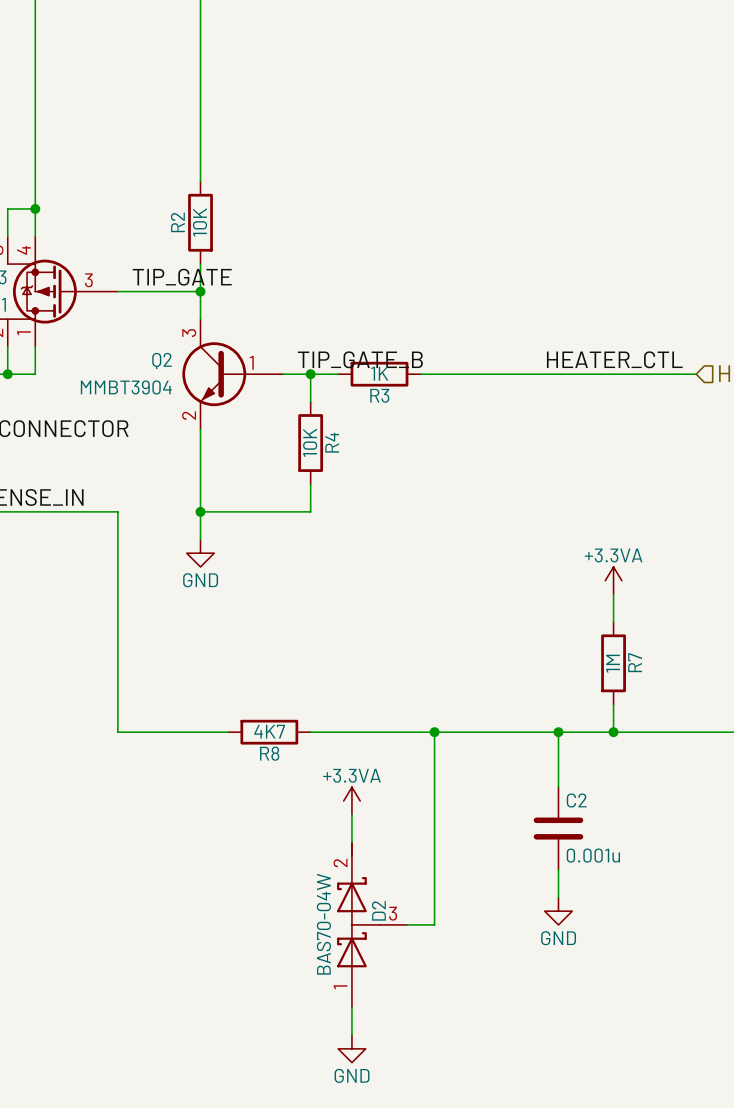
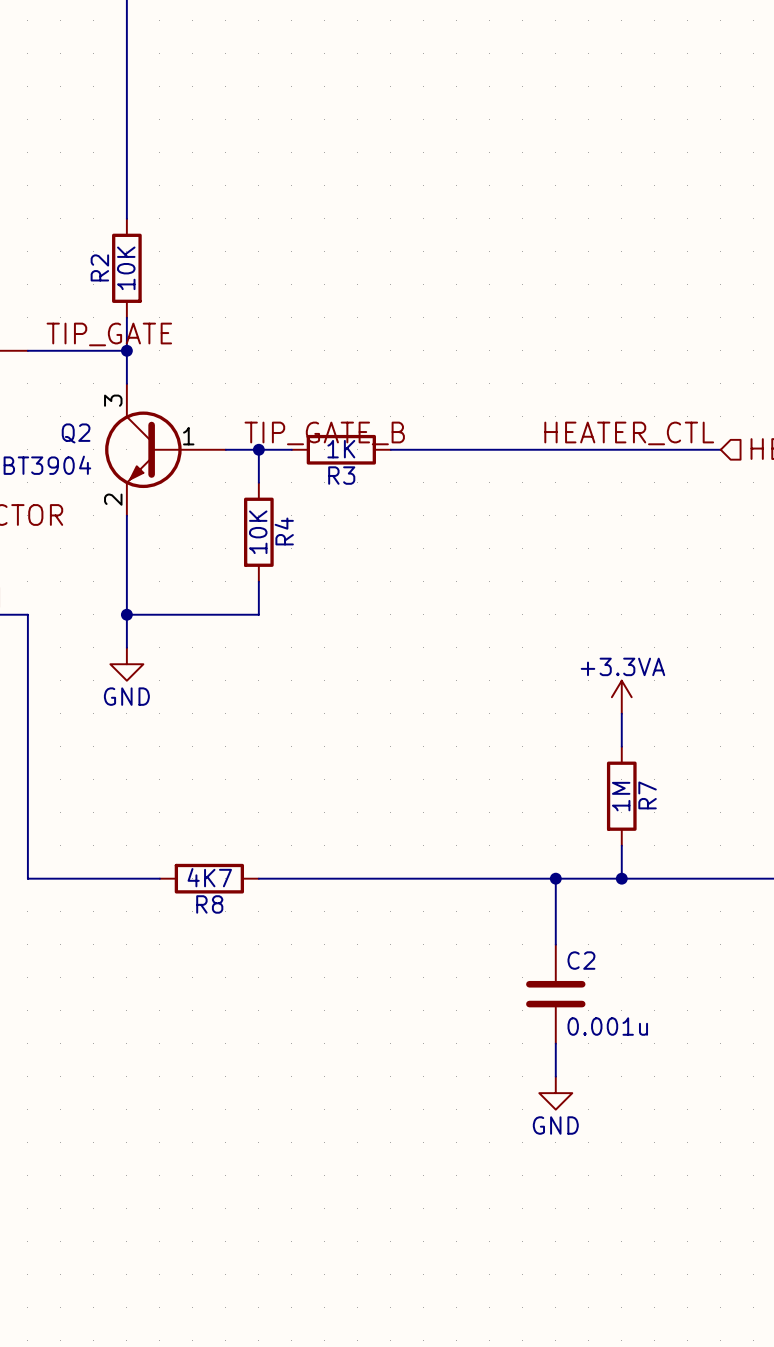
wire: (434, 732) (434, 924) (407, 924) -> none
junction: (434, 732) -> none
power symbol: +3.3VA (351, 801) -> none
wire: (351, 814) (351, 842) -> none
D2: BAS70-04W (372, 924) -> none
wire: (351, 1007) (351, 1035) -> none
power symbol: GND (351, 1048) -> none

